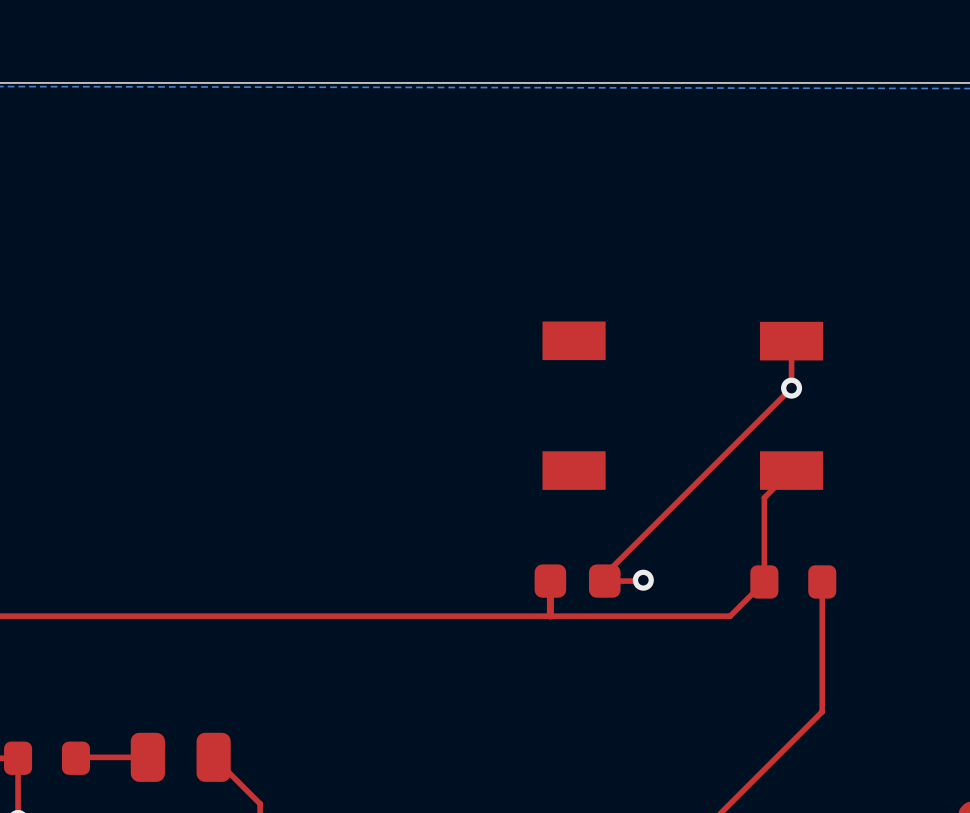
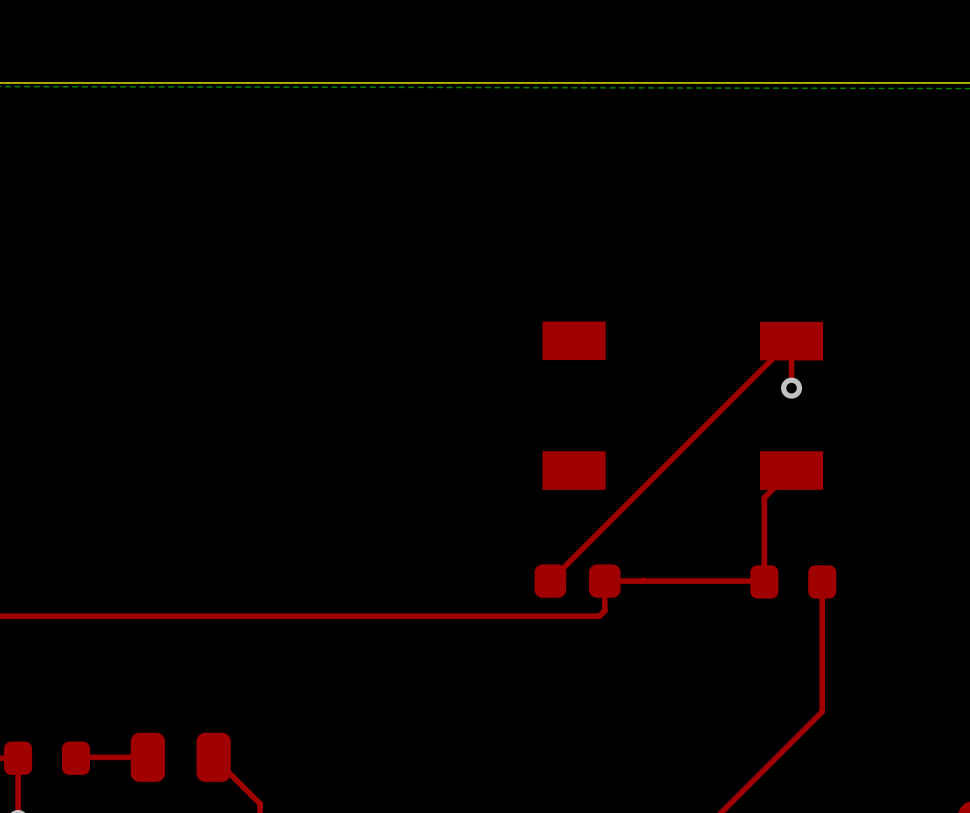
top track: (791, 388) (604, 574) (604, 581) -> (599, 616) (604, 610) (604, 581)
via: (643, 580) -> none
top track: (550, 581) (550, 616) -> (550, 581) (790, 341)
top track: (764, 581) (730, 616) (599, 616) -> (763, 581) (642, 581)

